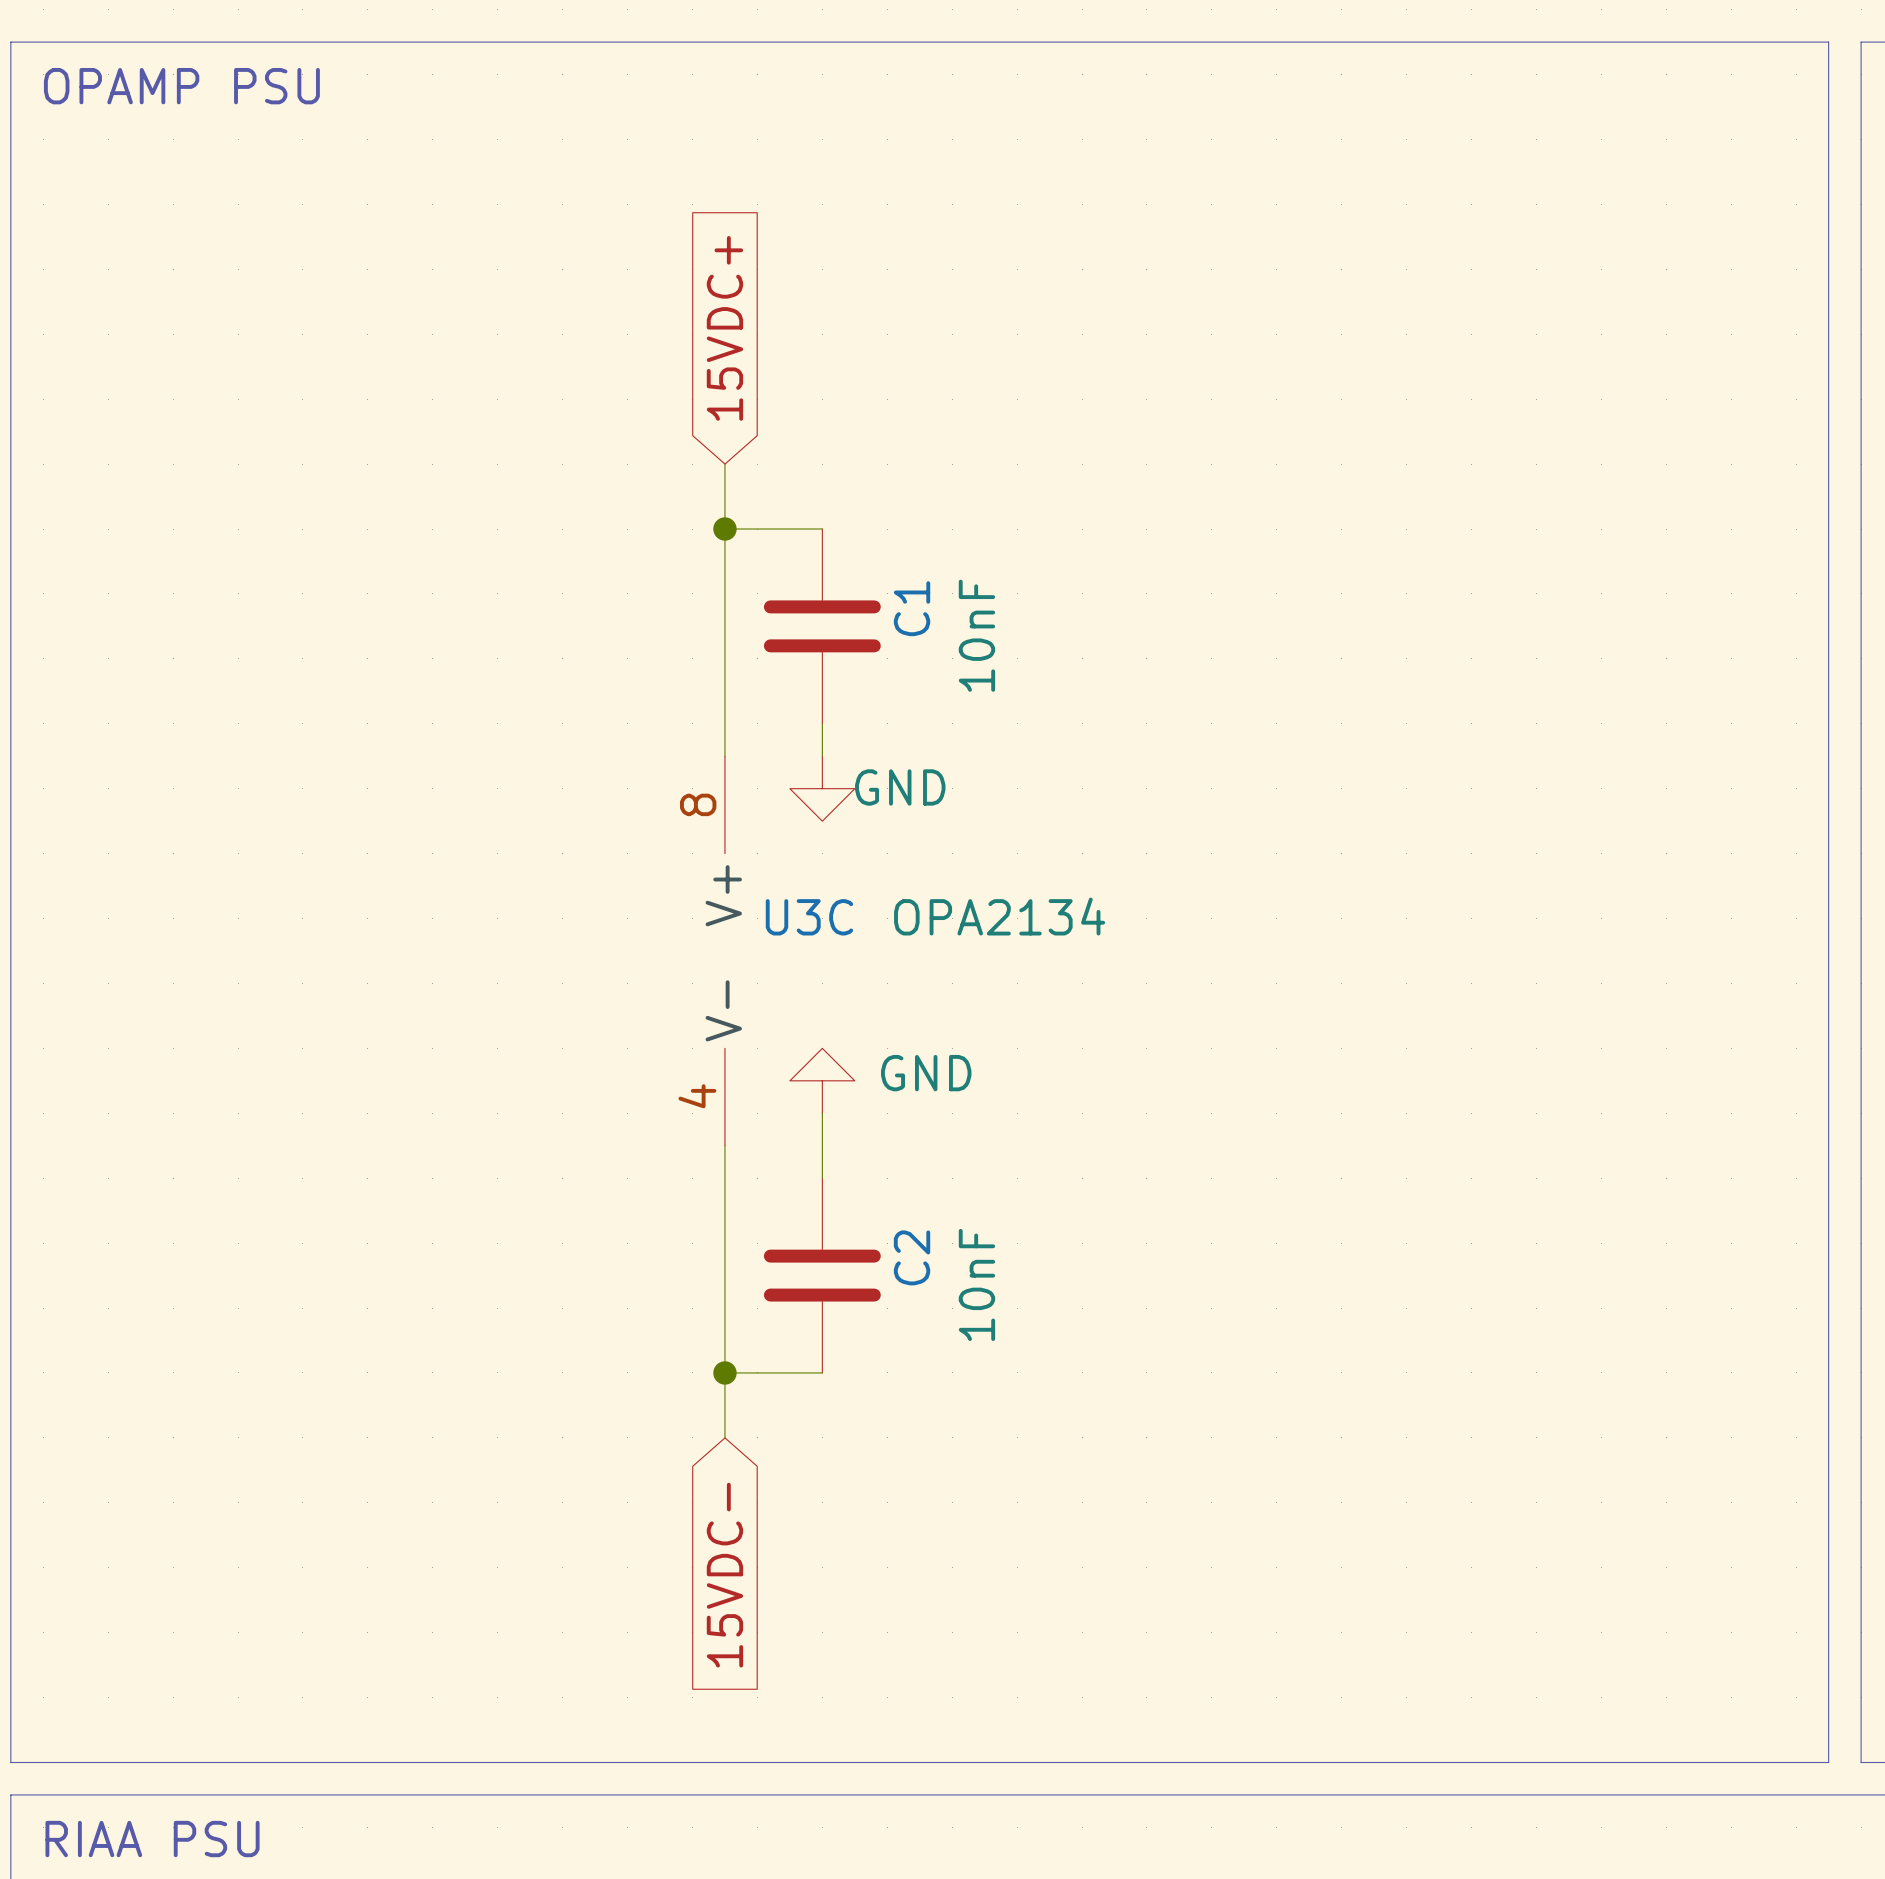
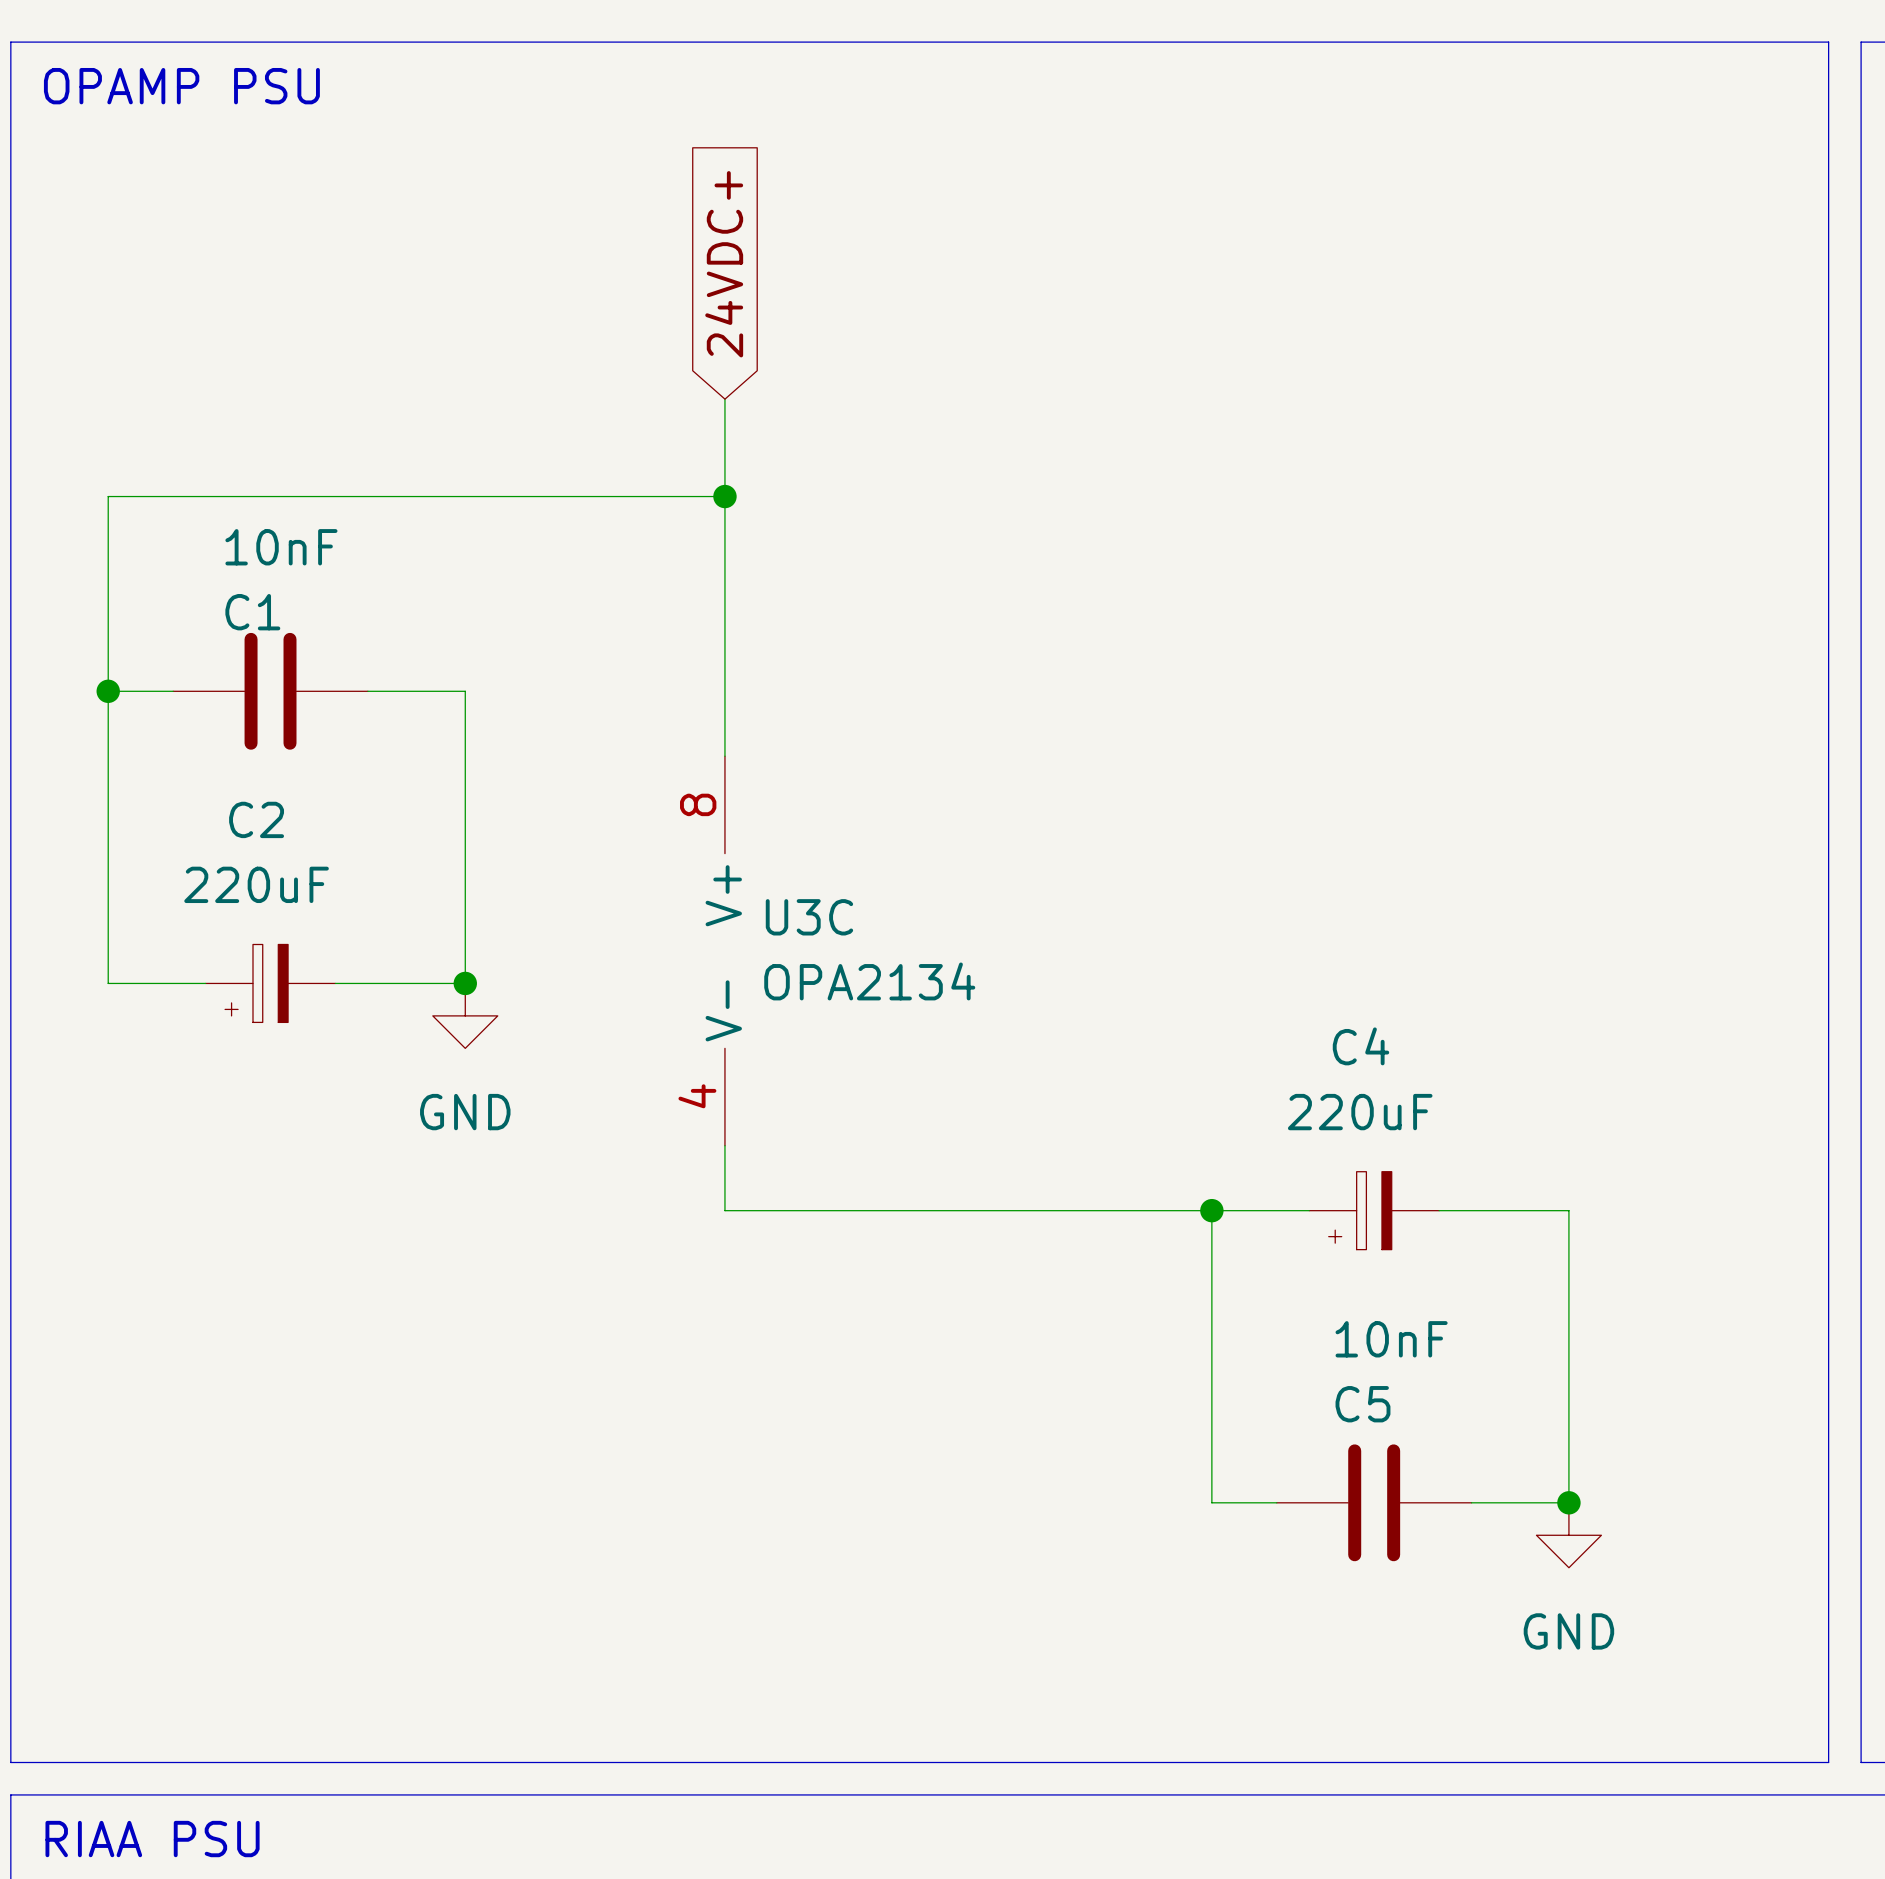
global label: 15VDC+ (724, 328) -> 24VDC+ (724, 264)
wire: none -> (724, 399) (724, 464)
wire: none -> (724, 496) (108, 496) (108, 983) (205, 983)
wire: (724, 529) (822, 529) -> none
junction position: (724, 529) -> (724, 496)
C1 name position: C1 (912, 608) -> C1 (252, 612)
C1 rotation: 0° (822, 626) -> 90° clockwise (270, 691)
C1 position: (822, 626) -> (270, 691)
C1 value position: 10nF (976, 635) -> 10nF (281, 547)
wire: none -> (108, 691) (173, 691)
junction: none -> (108, 691)
wire: none -> (367, 691) (465, 691) (465, 983) (335, 983)
wire: (822, 723) (822, 756) -> none
power symbol: GND (822, 788) -> none
U3C value position: OPA2134 (999, 916) -> OPA2134 (869, 981)
junction: none -> (465, 983)
power symbol: none -> GND (465, 1015)
power symbol: GND (822, 1080) -> none
wire: (822, 1113) (822, 1178) -> none
C2 symbol: [763, 1178, 881, 1373] -> [205, 944, 336, 1023]
wire: (724, 1210) (724, 1437) -> (724, 1210) (1309, 1210)
wire: none -> (1211, 1210) (1211, 1502) (1276, 1502)
junction: none -> (1211, 1210)
C4: none -> 220uF (1374, 1210)
wire: none -> (1439, 1210) (1568, 1210) (1568, 1502) (1471, 1502)
C2 name position: C2 (912, 1257) -> C2 (256, 819)
C2 value: 10nF (976, 1284) -> 220uF (256, 884)
wire: (724, 1372) (822, 1372) -> none
junction: (724, 1372) -> none
C5: none -> 10nF (1374, 1502)
junction: none -> (1568, 1502)
power symbol: none -> GND (1568, 1535)
global label: 15VDC- (724, 1575) -> none

